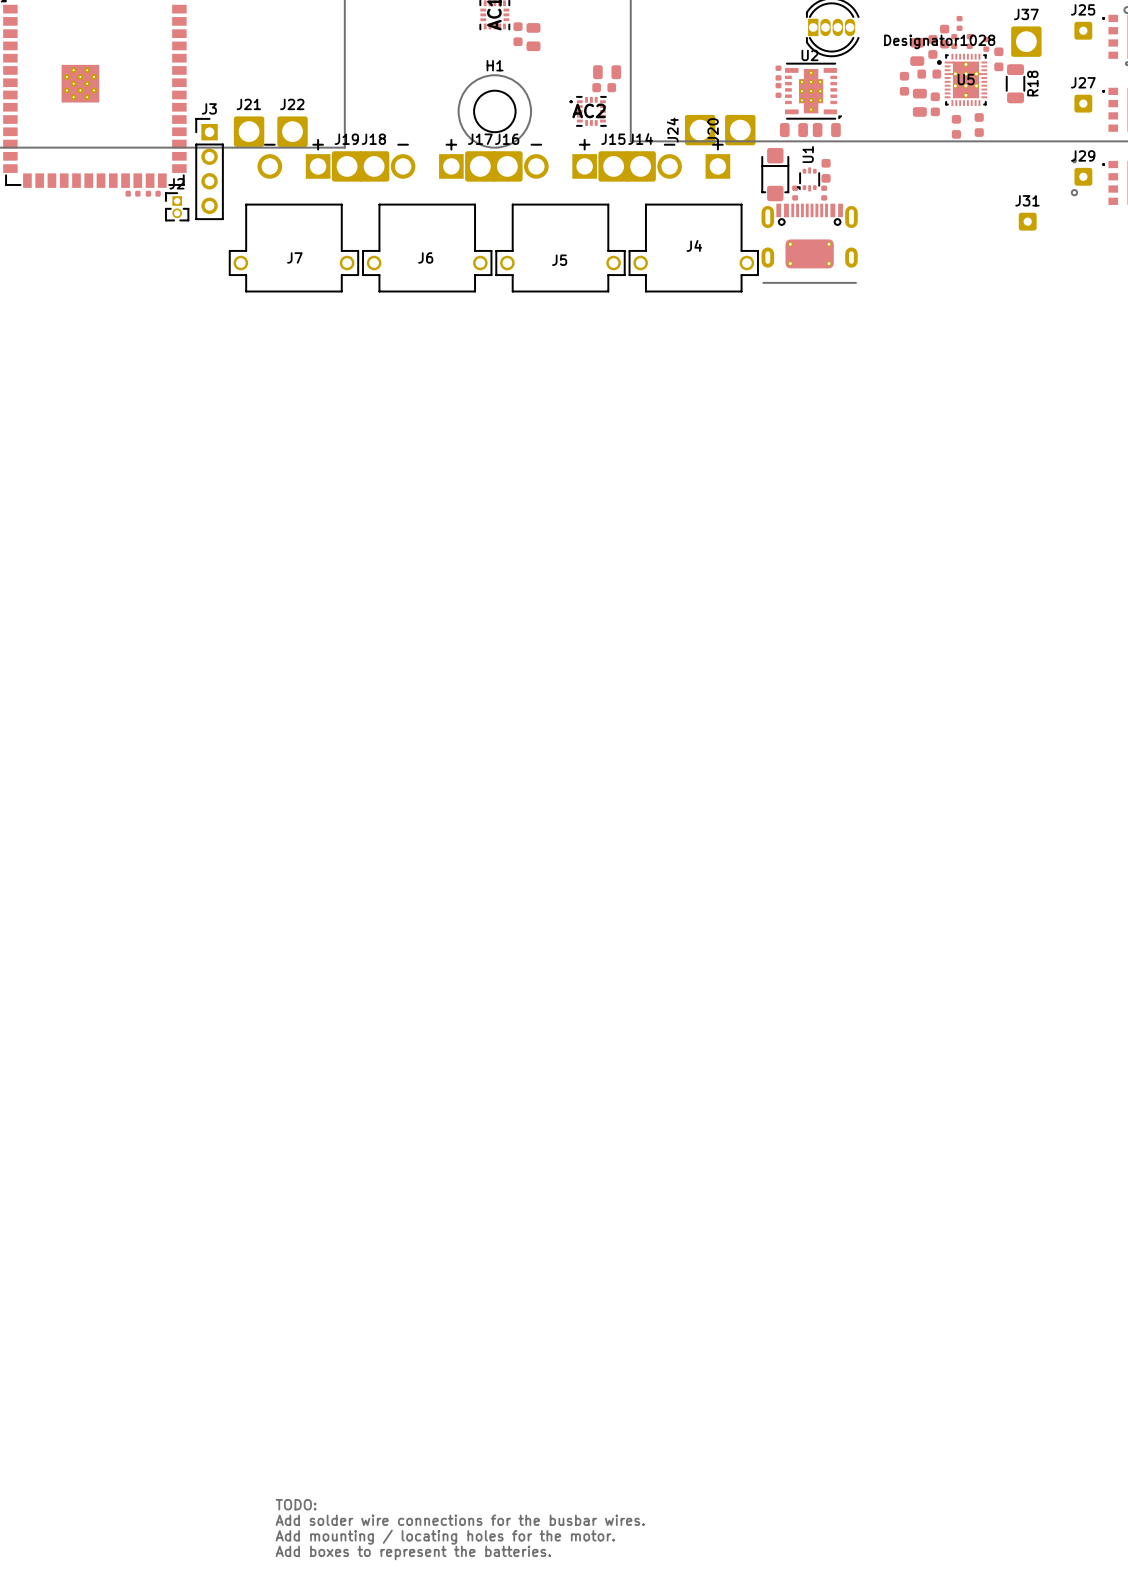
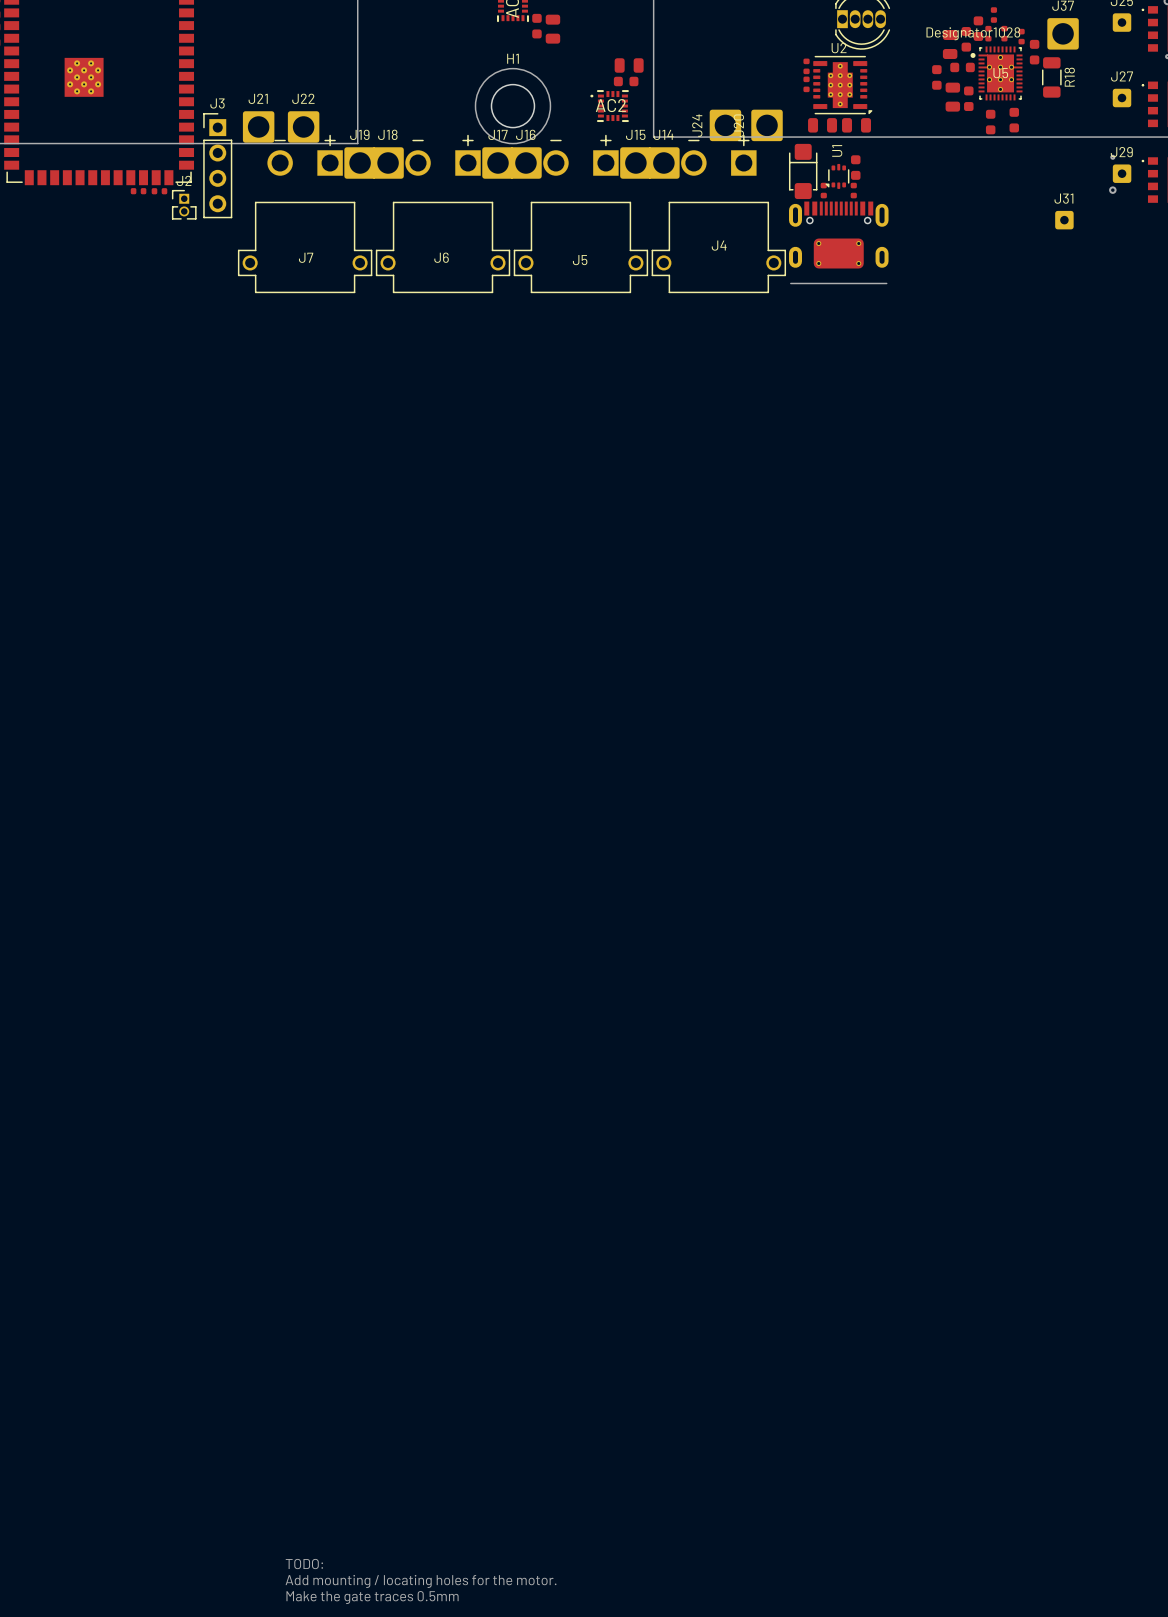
text: TODO: (296, 1504) -> none
text: Add solder wire connections for the busbar wires. (460, 1520) -> TODO: (304, 1564)
text: Add boxes to represent the batteries. (413, 1552) -> Make the gate traces 0.5mm (372, 1597)

